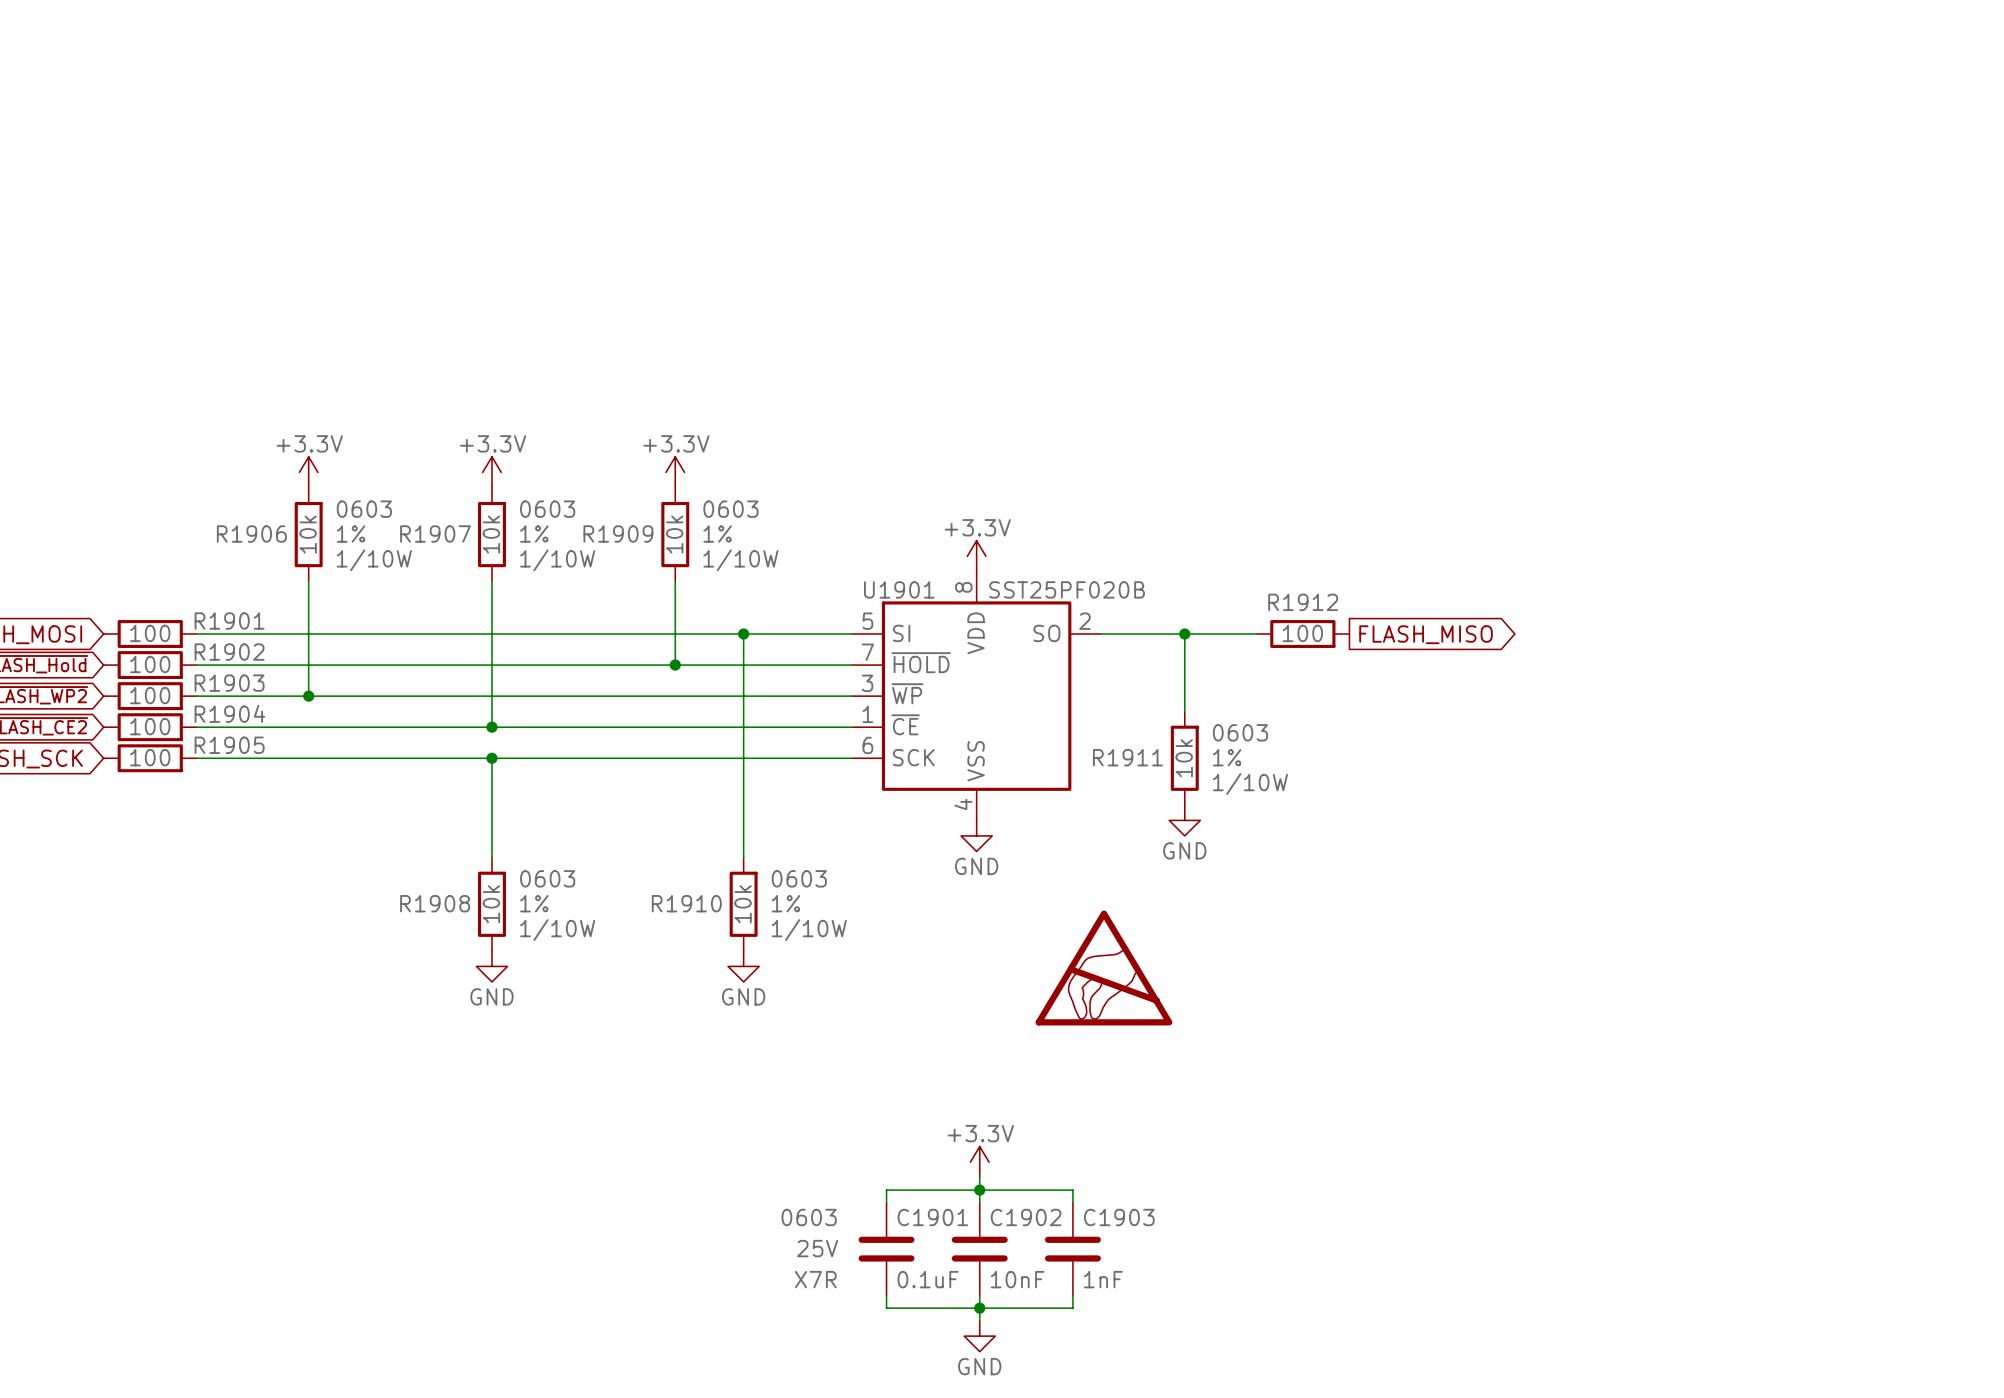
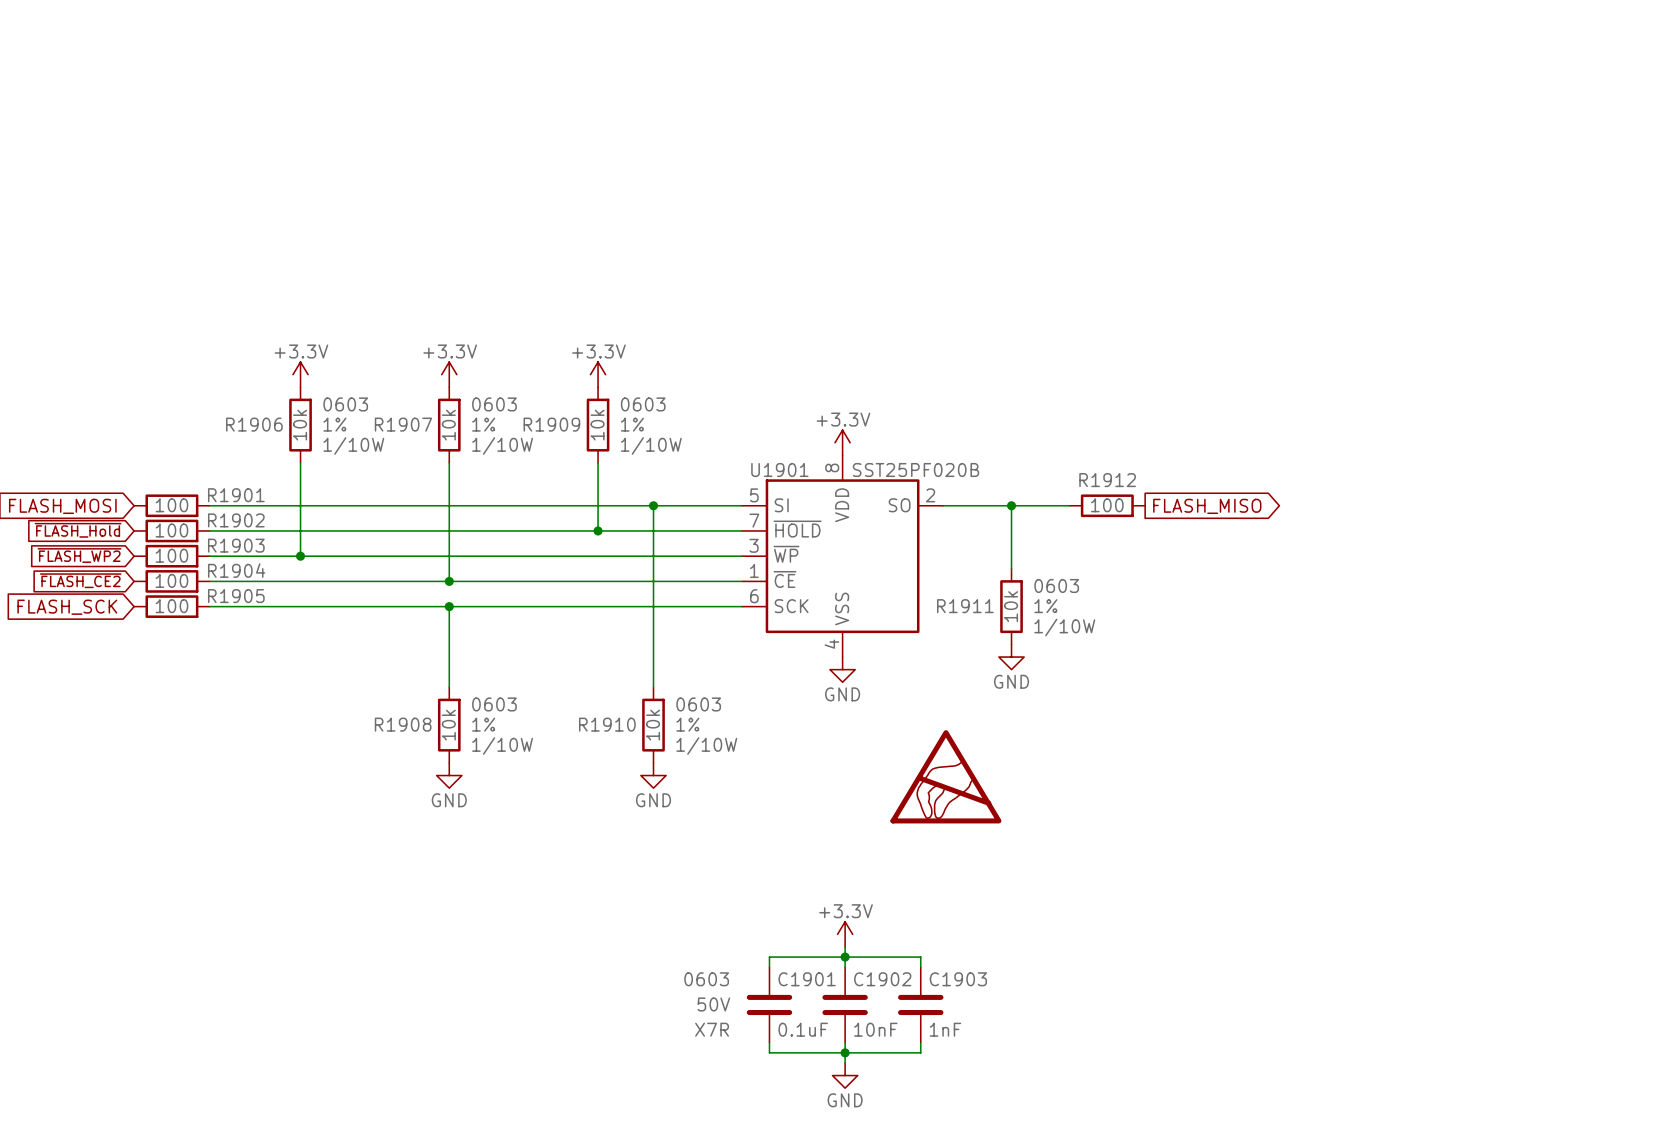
C1901 text: 25V (817, 1248) -> 50V (713, 1004)

